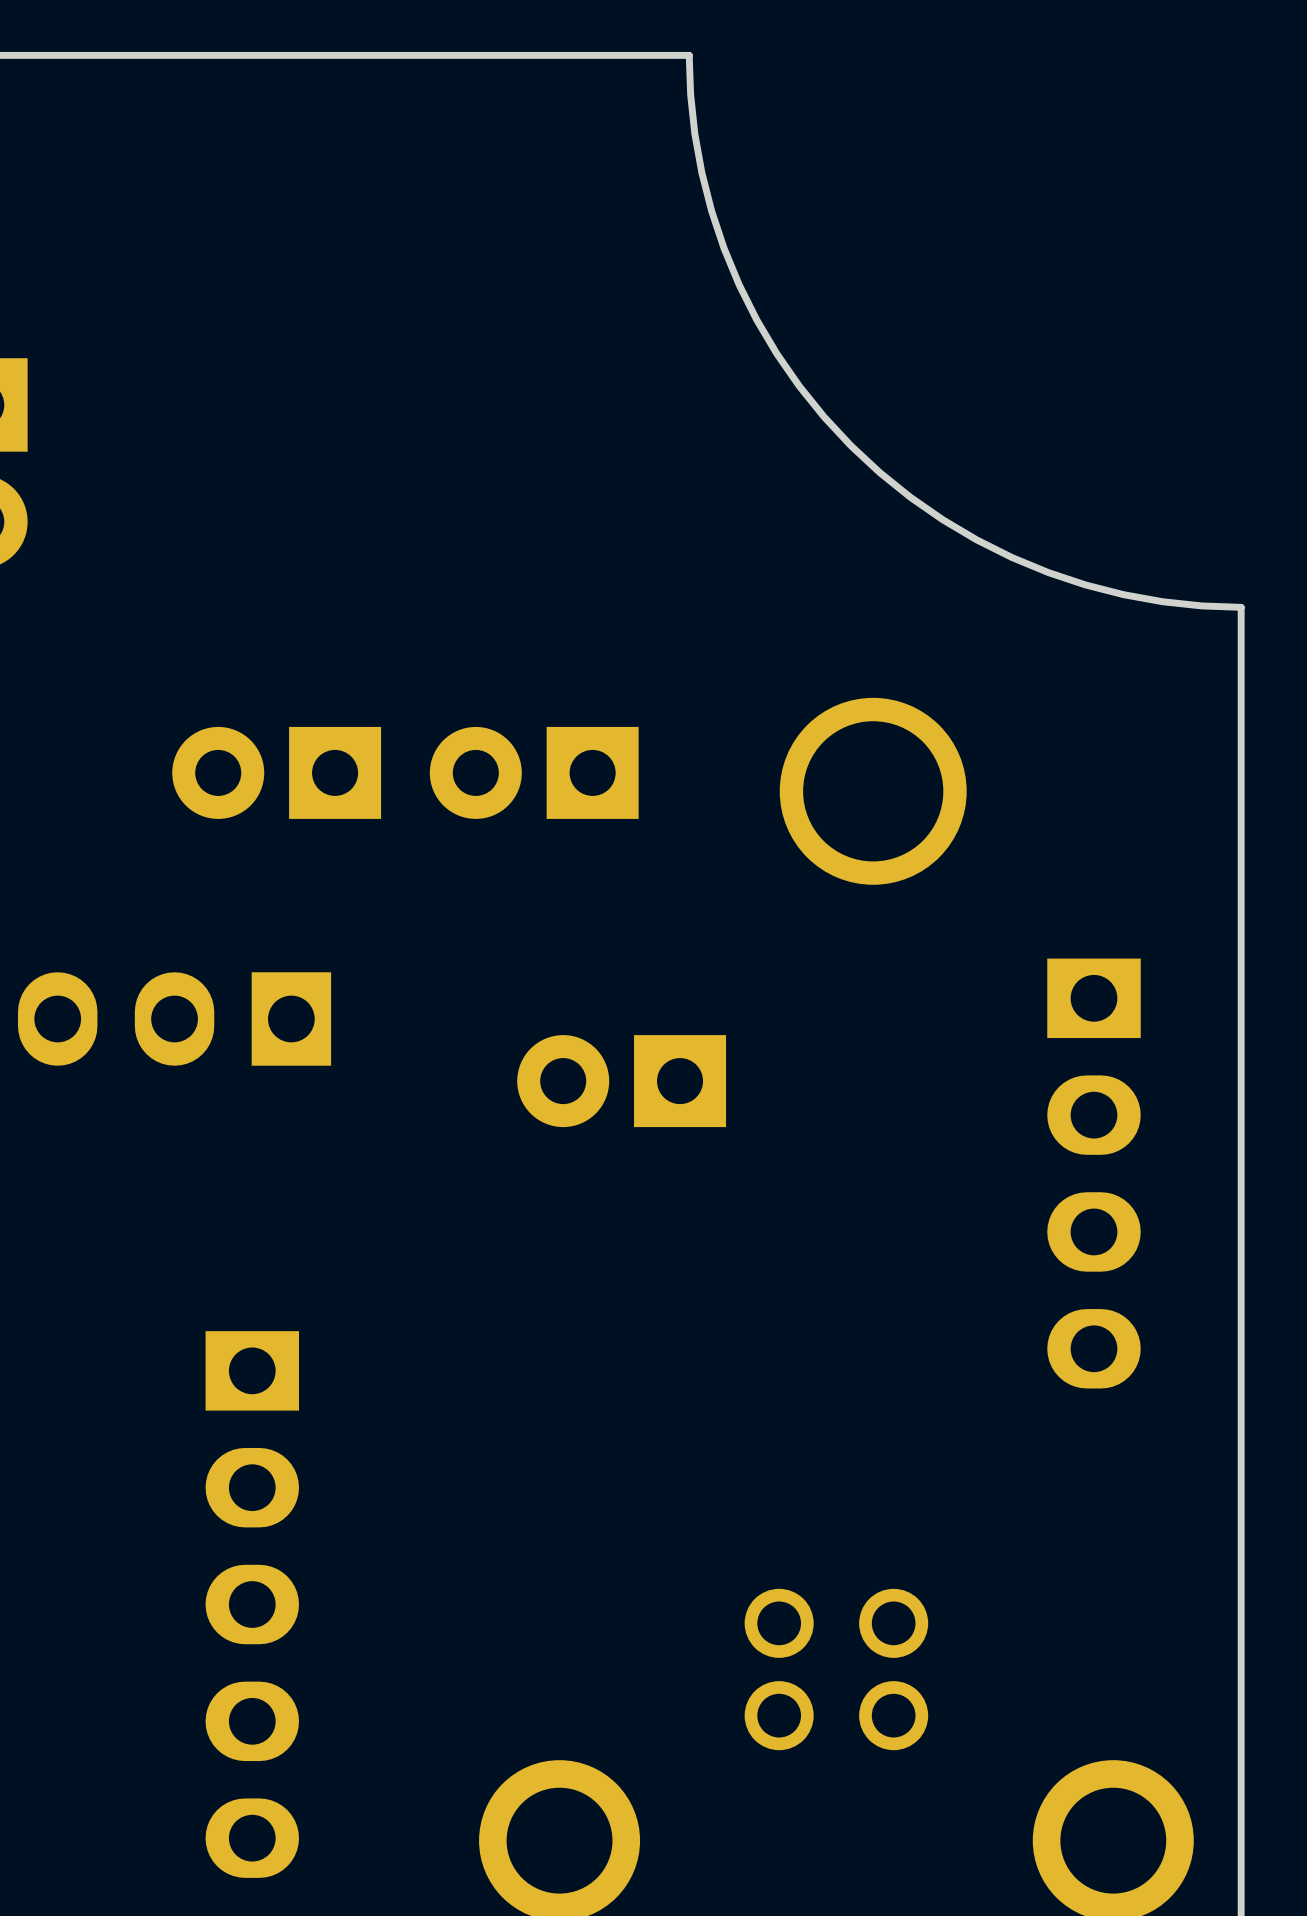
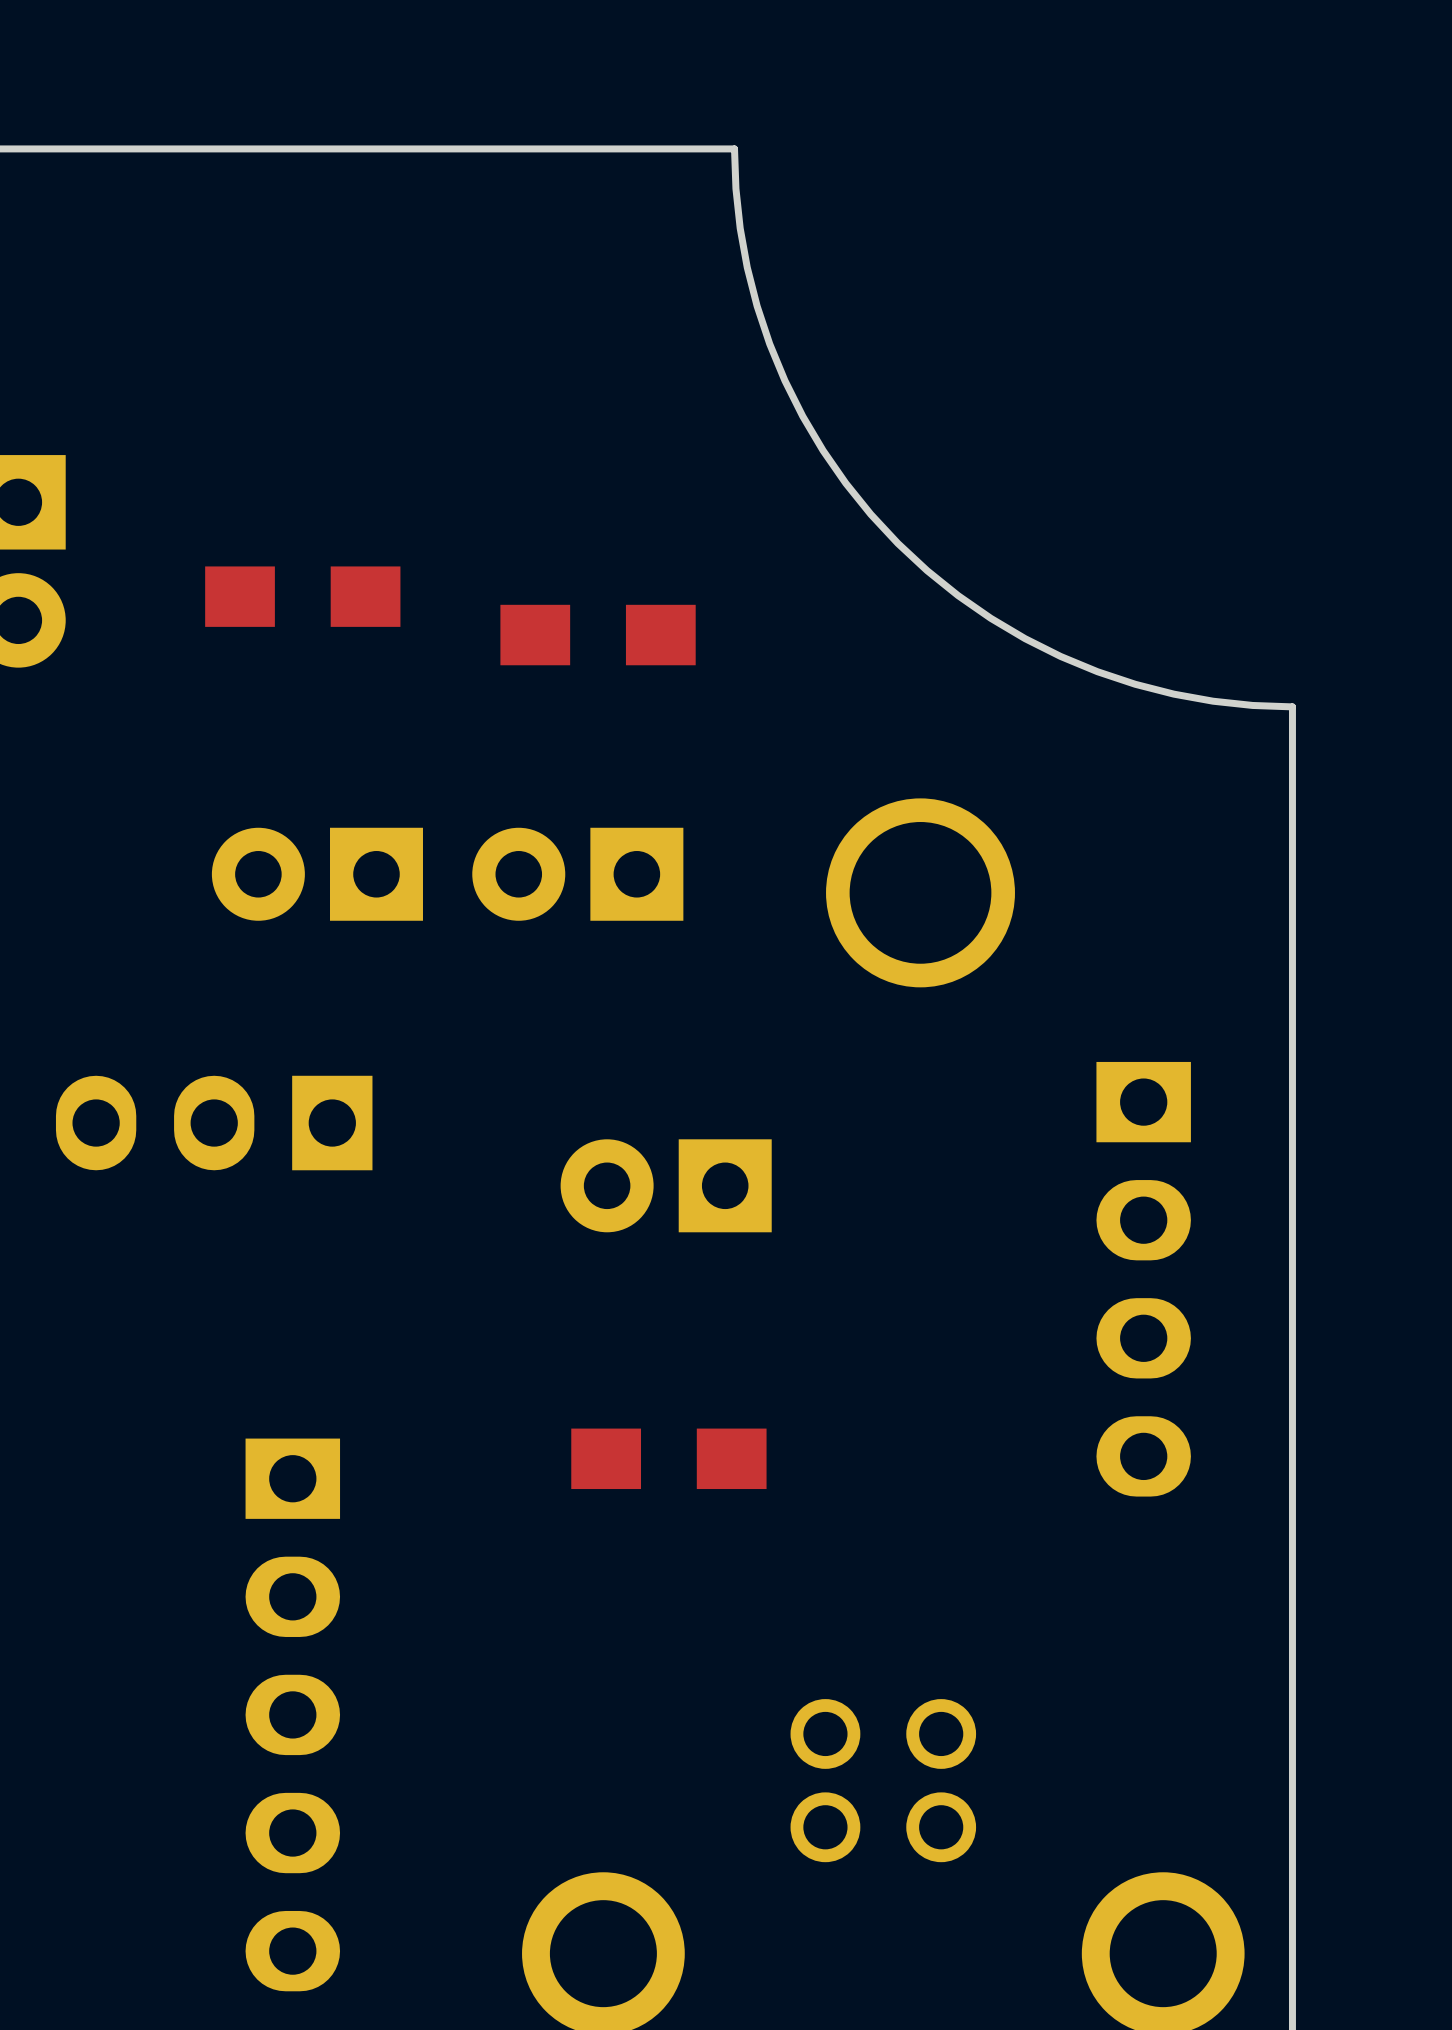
part: none -> (302, 596)
part: none -> (598, 635)
part: none -> (668, 1458)

